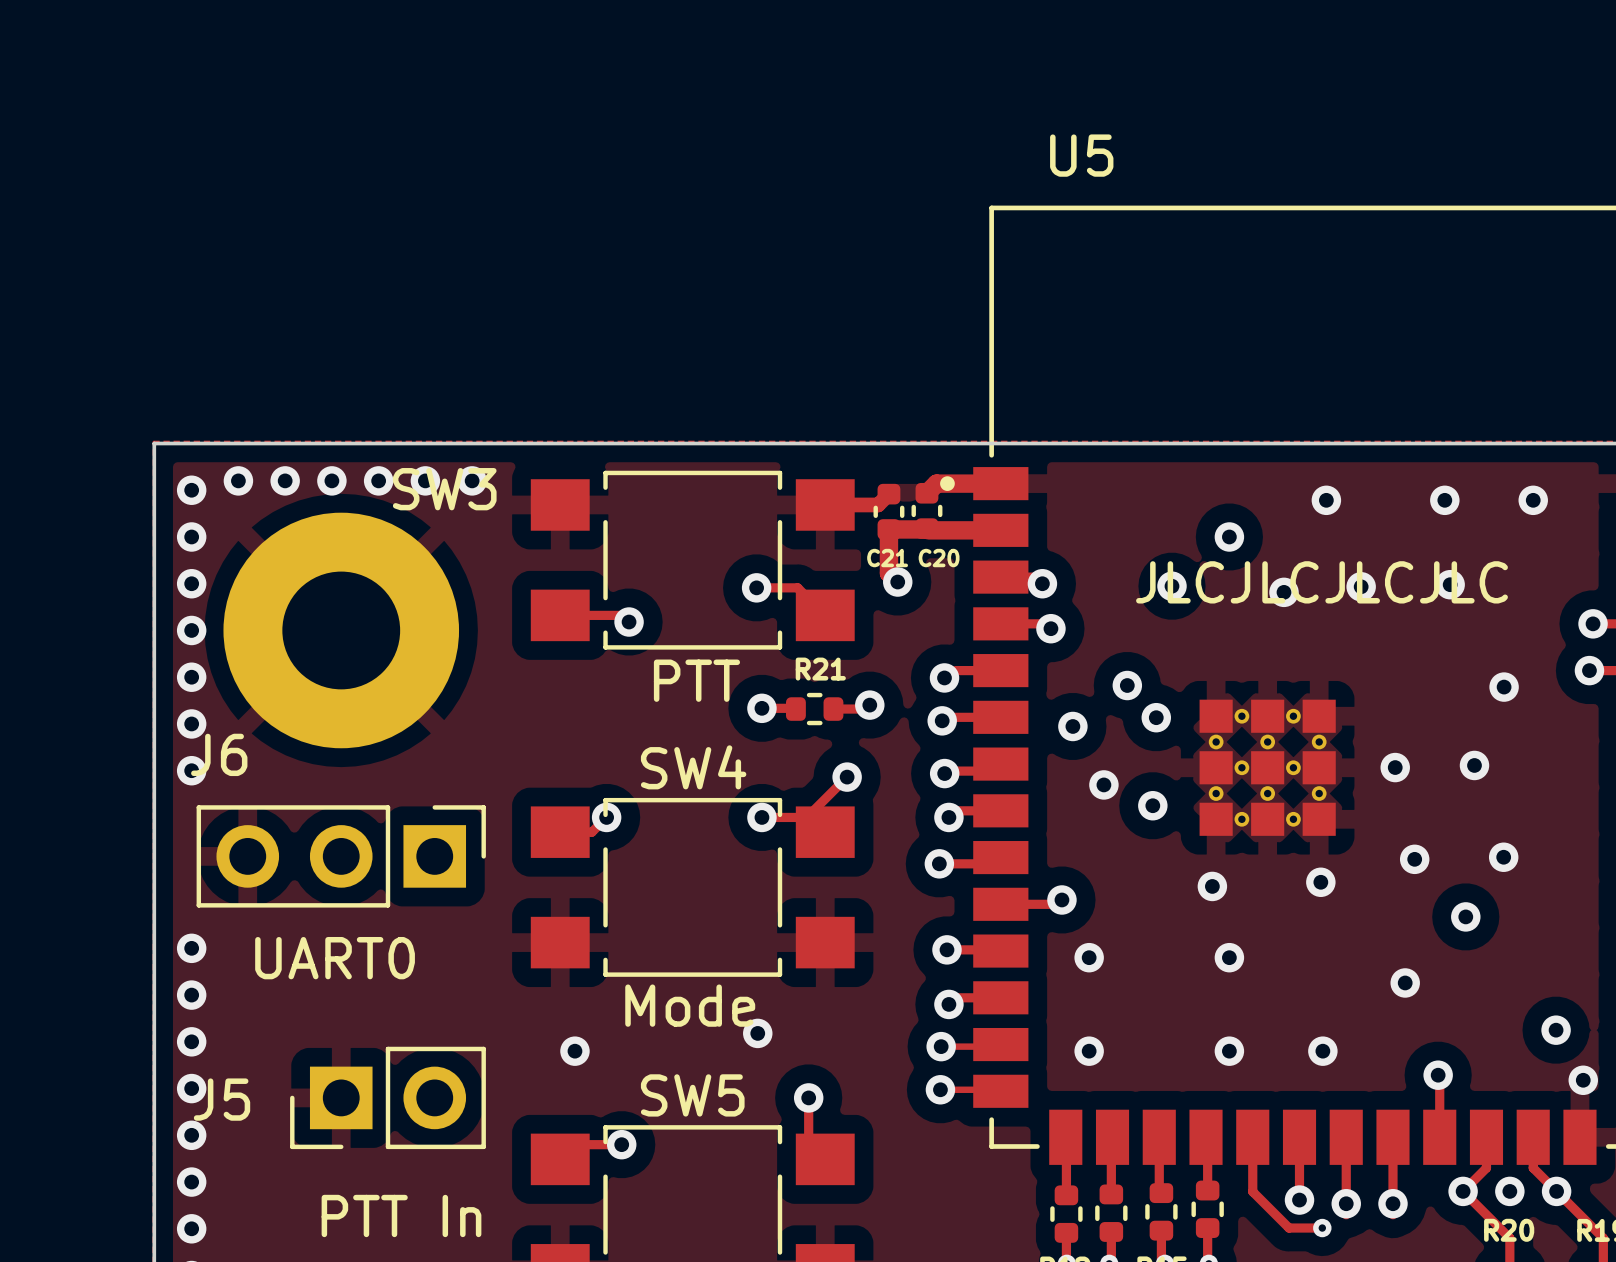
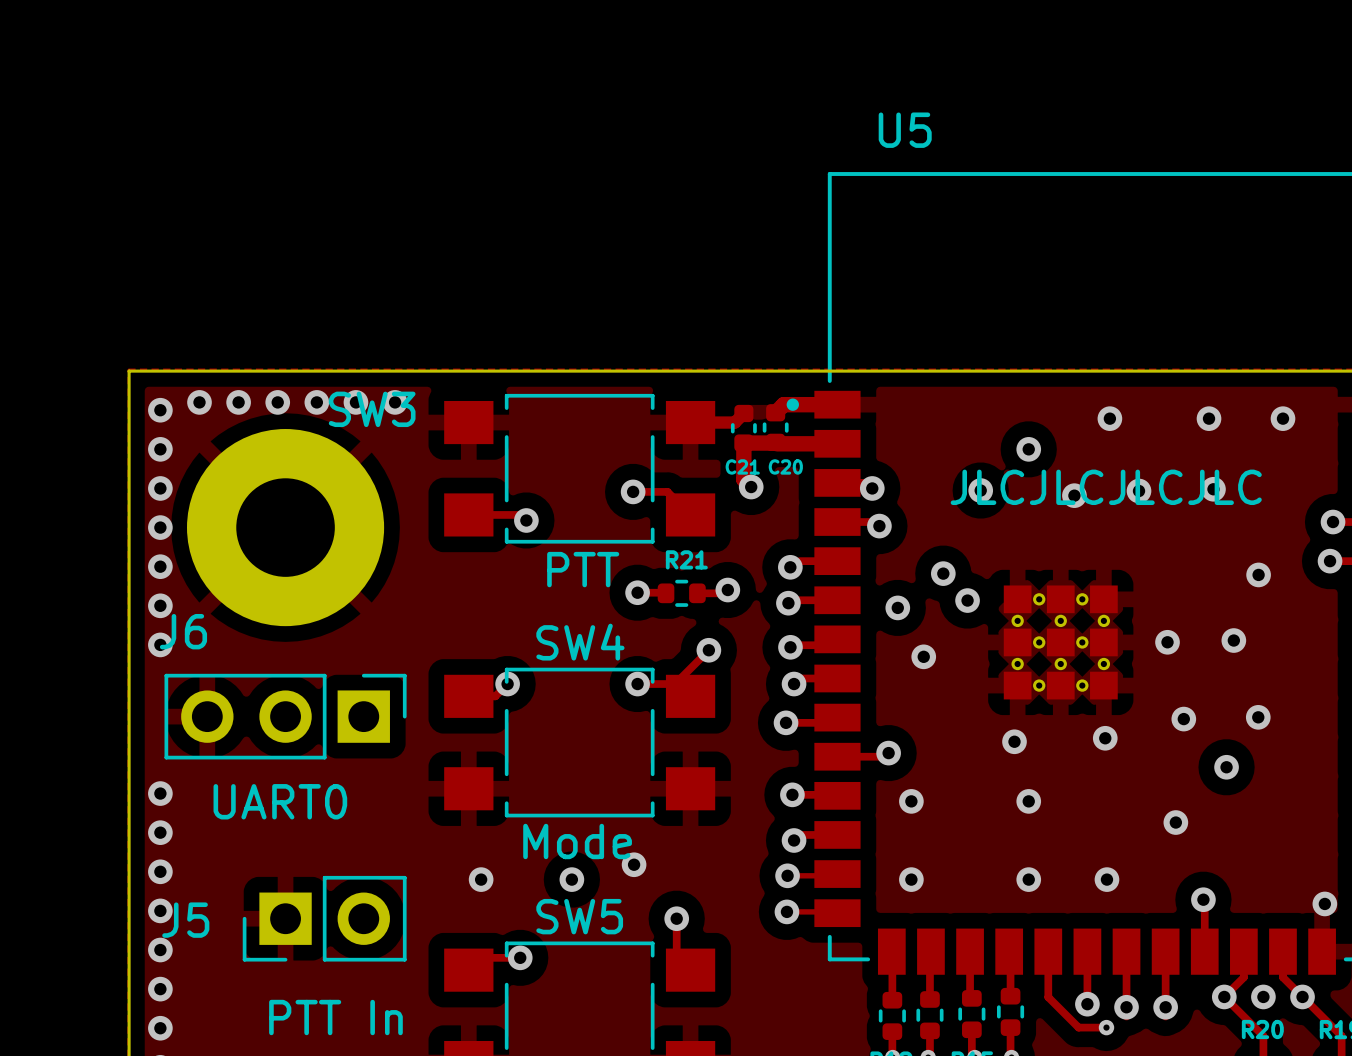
via: (1152, 805) -> none
via: (1556, 1030) -> none
via: none -> (571, 879)

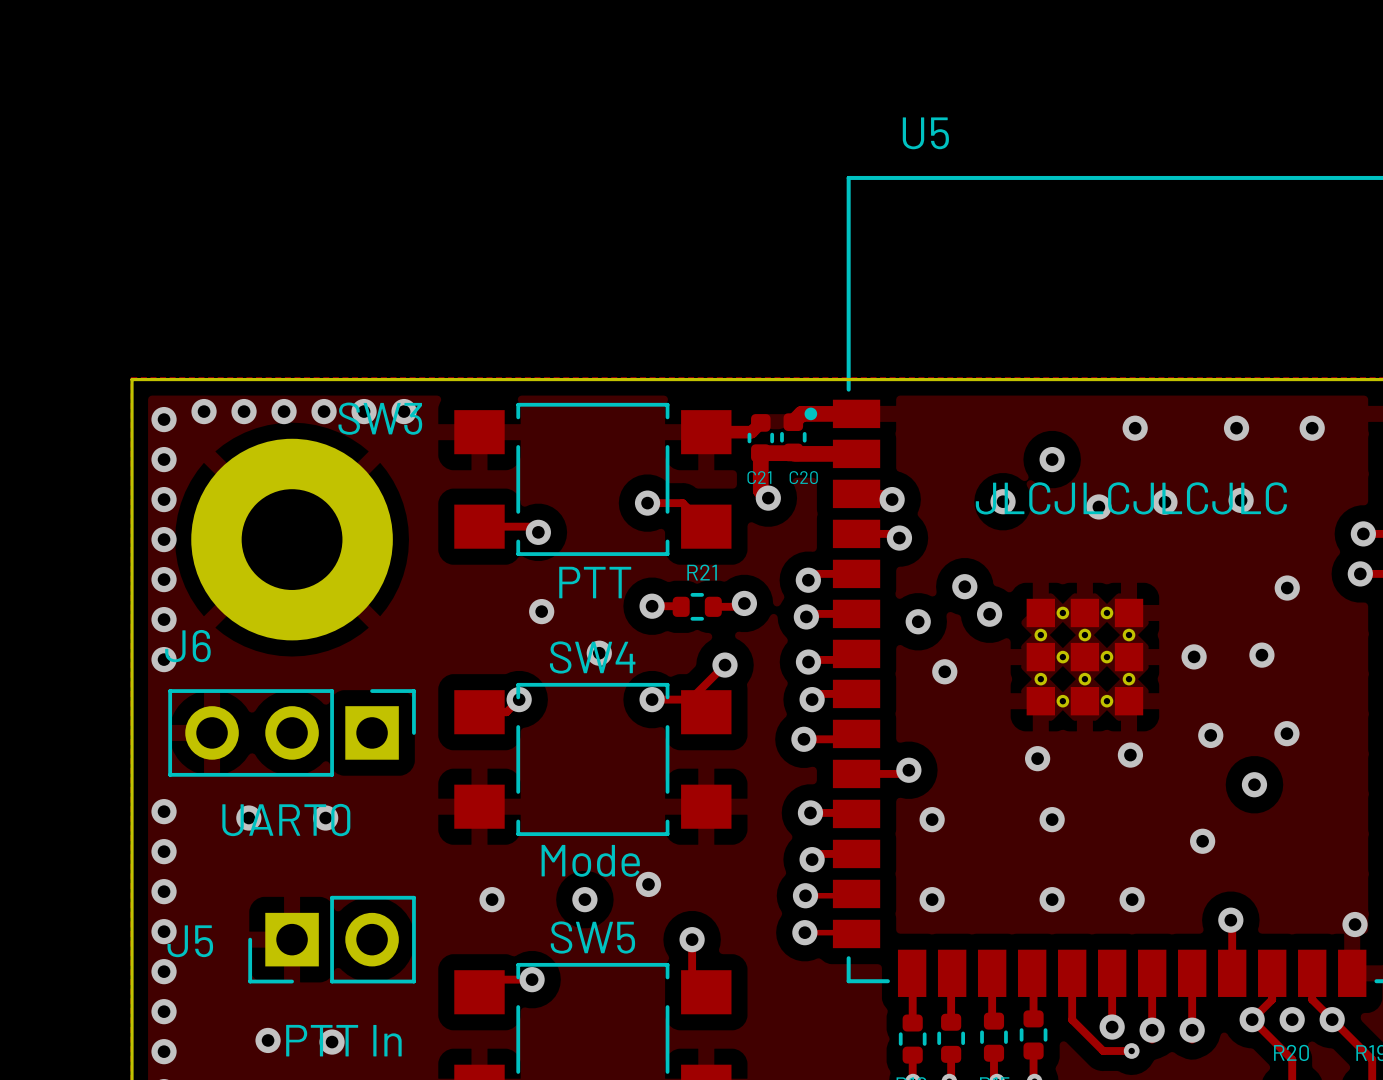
via: none -> (541, 611)
via: none -> (599, 653)
via: none -> (248, 818)
via: none -> (325, 818)
via: none -> (268, 1040)
via: none -> (332, 1042)

